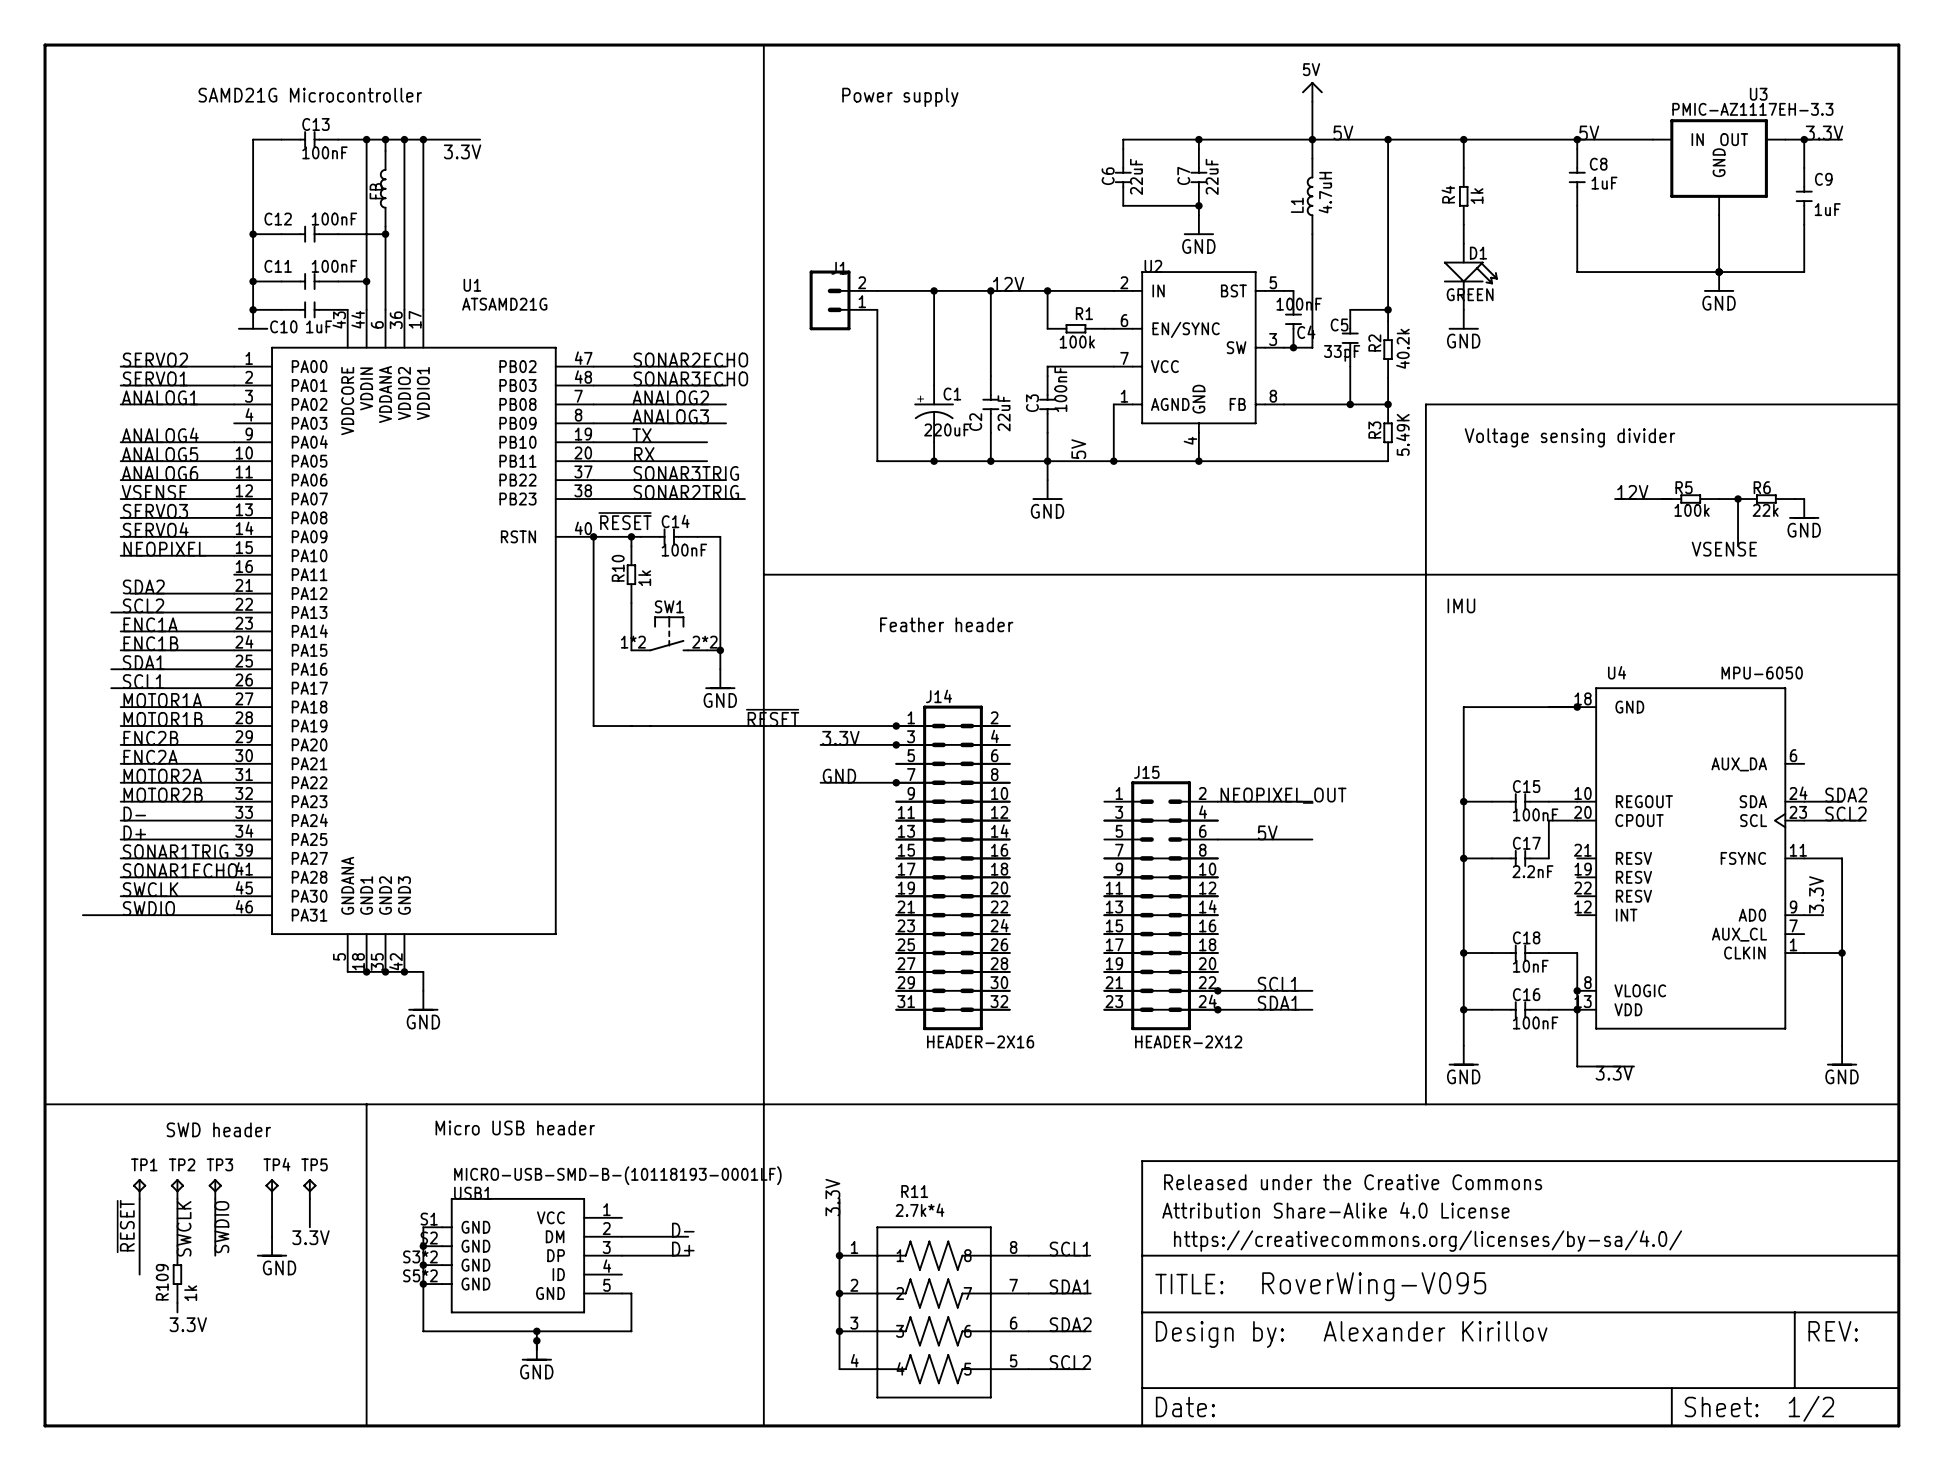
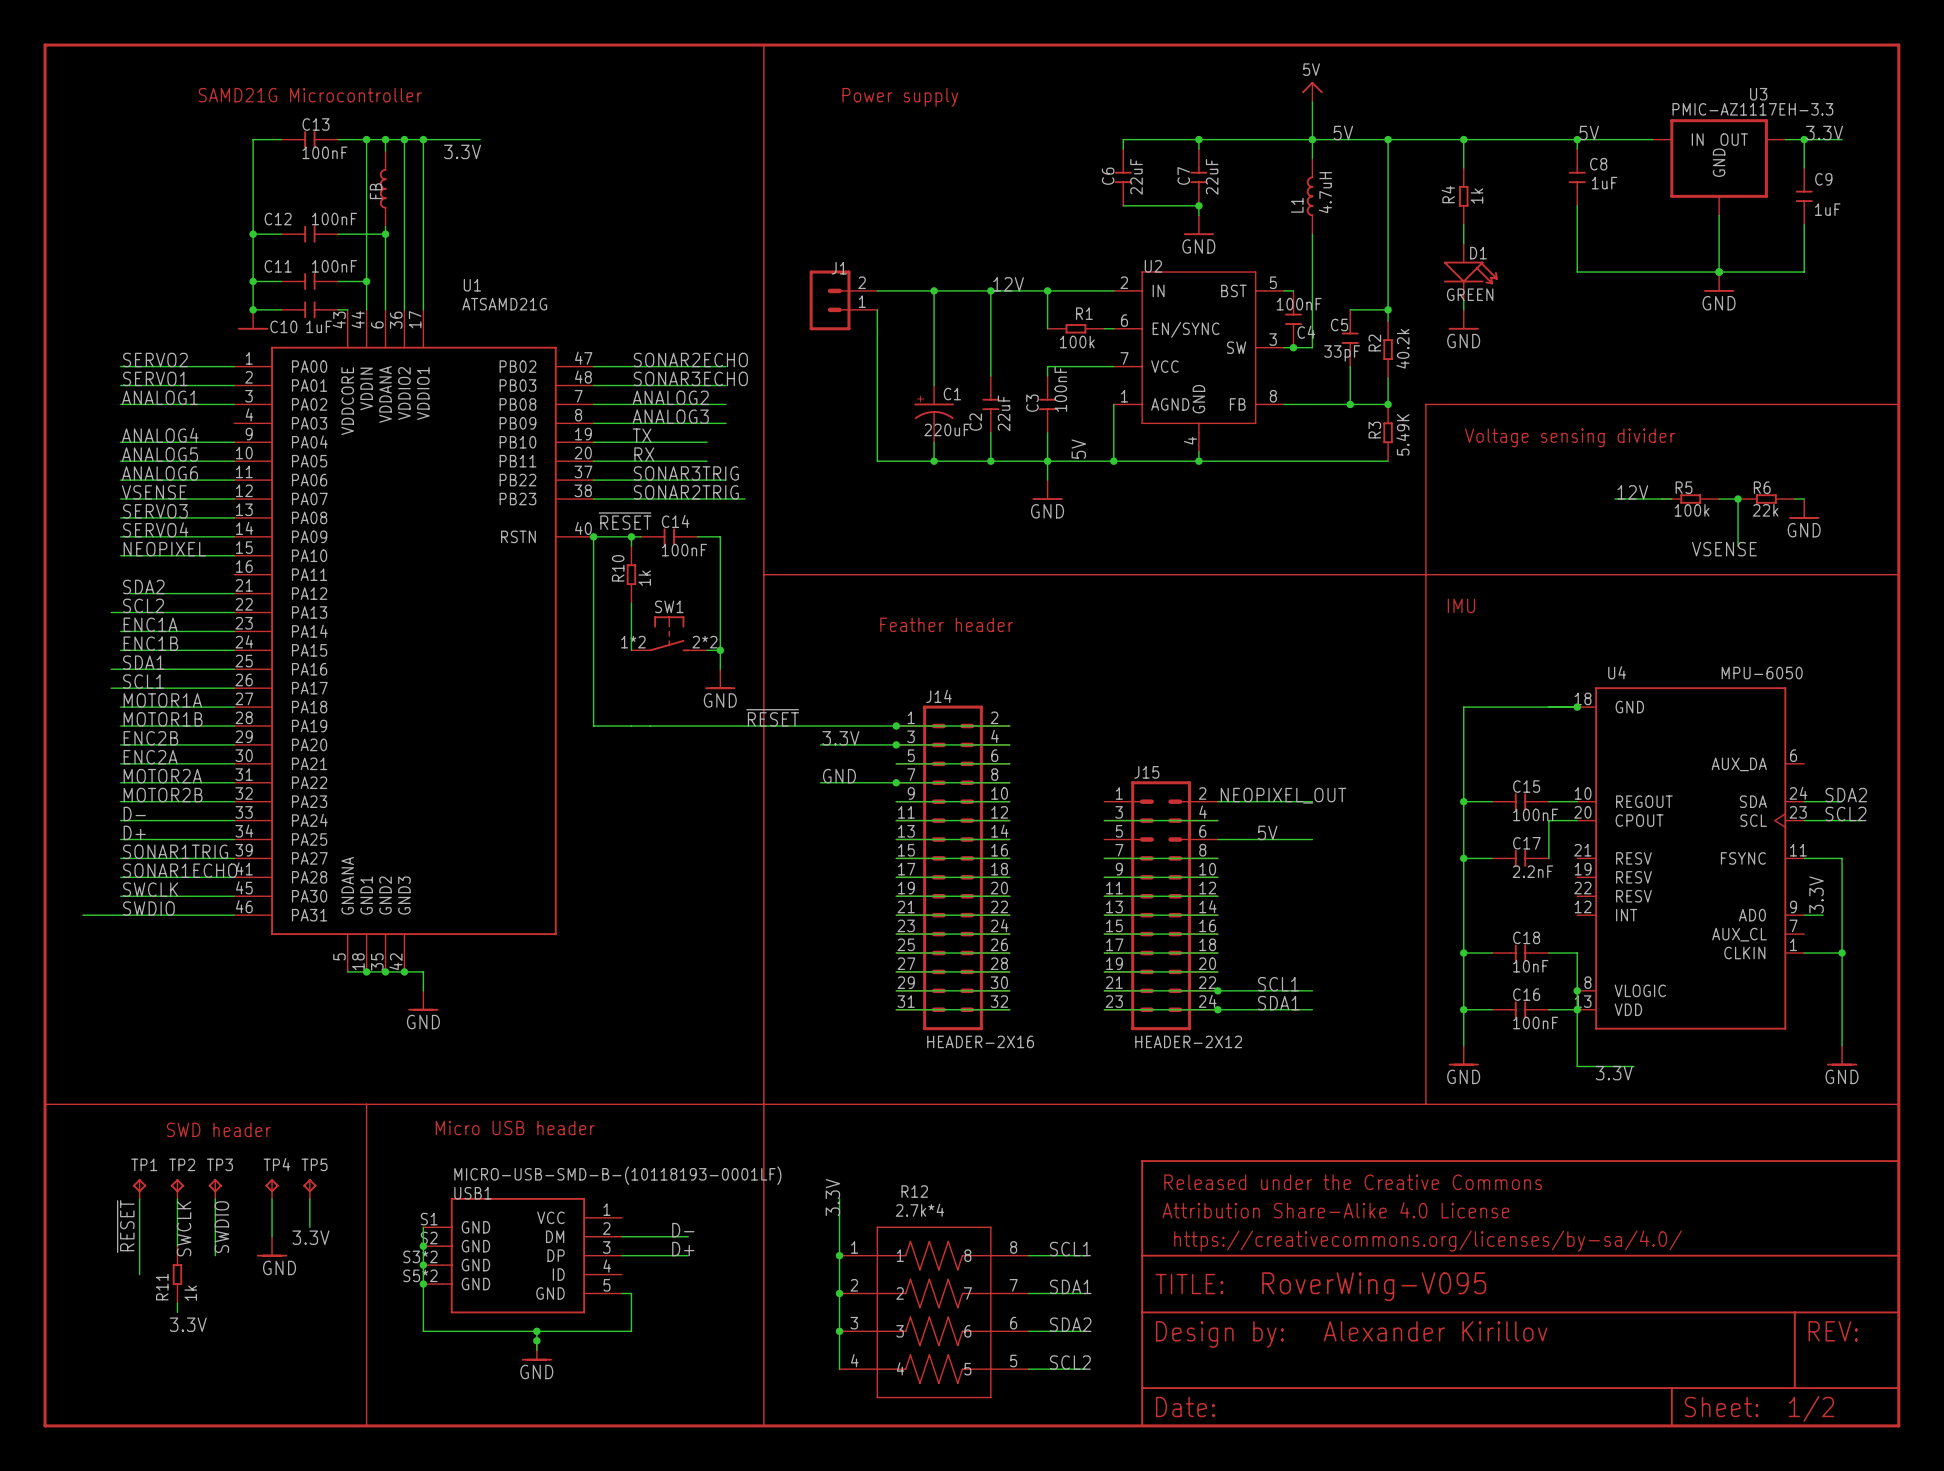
R11 name: R11 (914, 1191) -> R12 (914, 1191)
R109 name: R109 (162, 1282) -> R11 (162, 1287)

